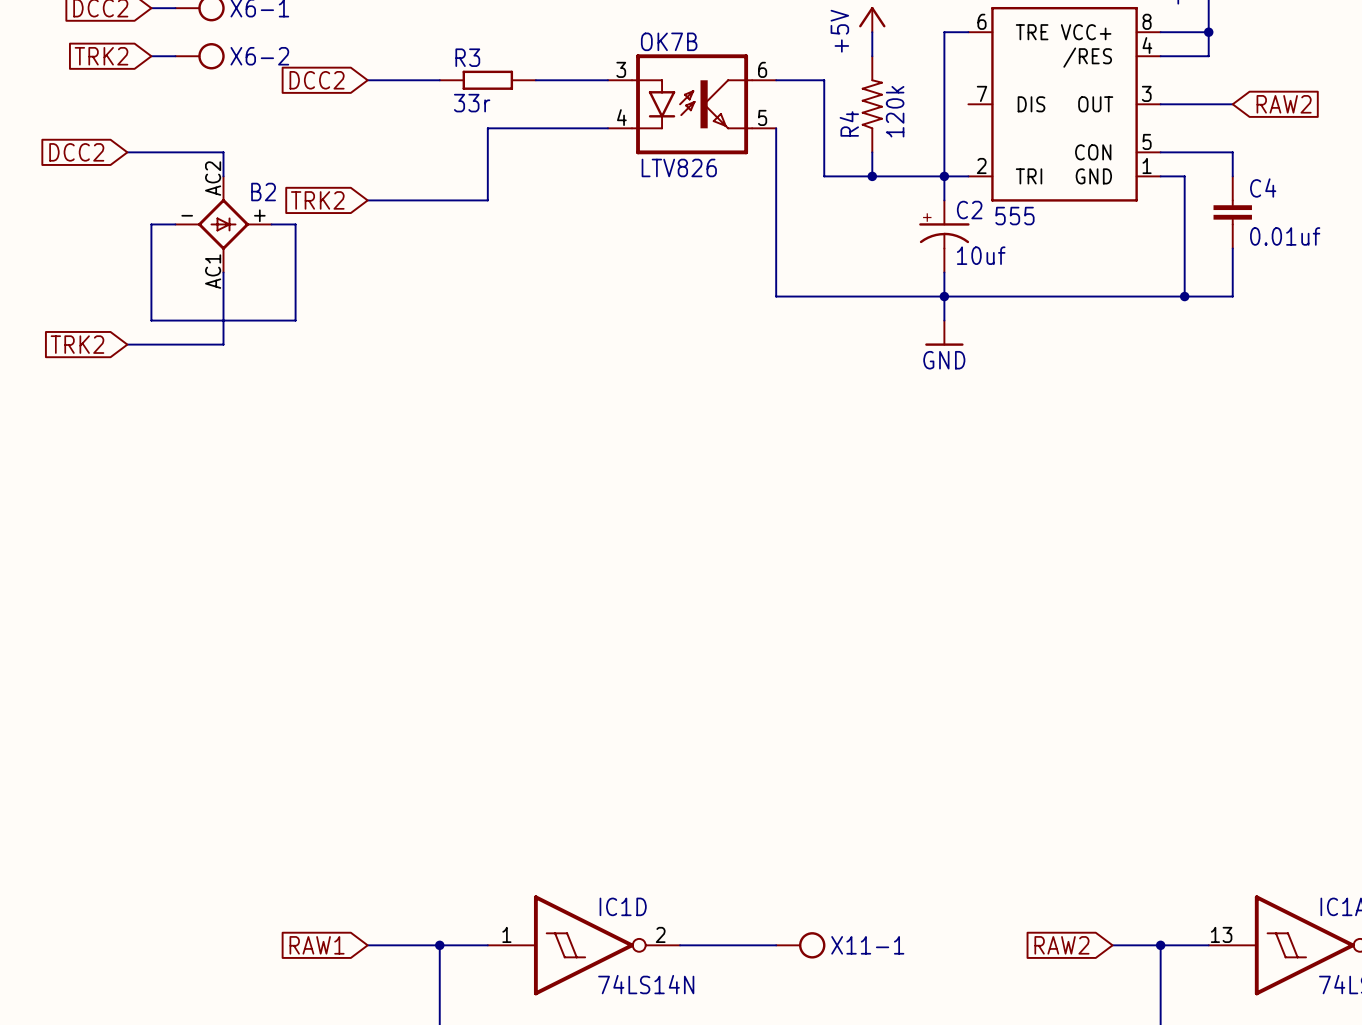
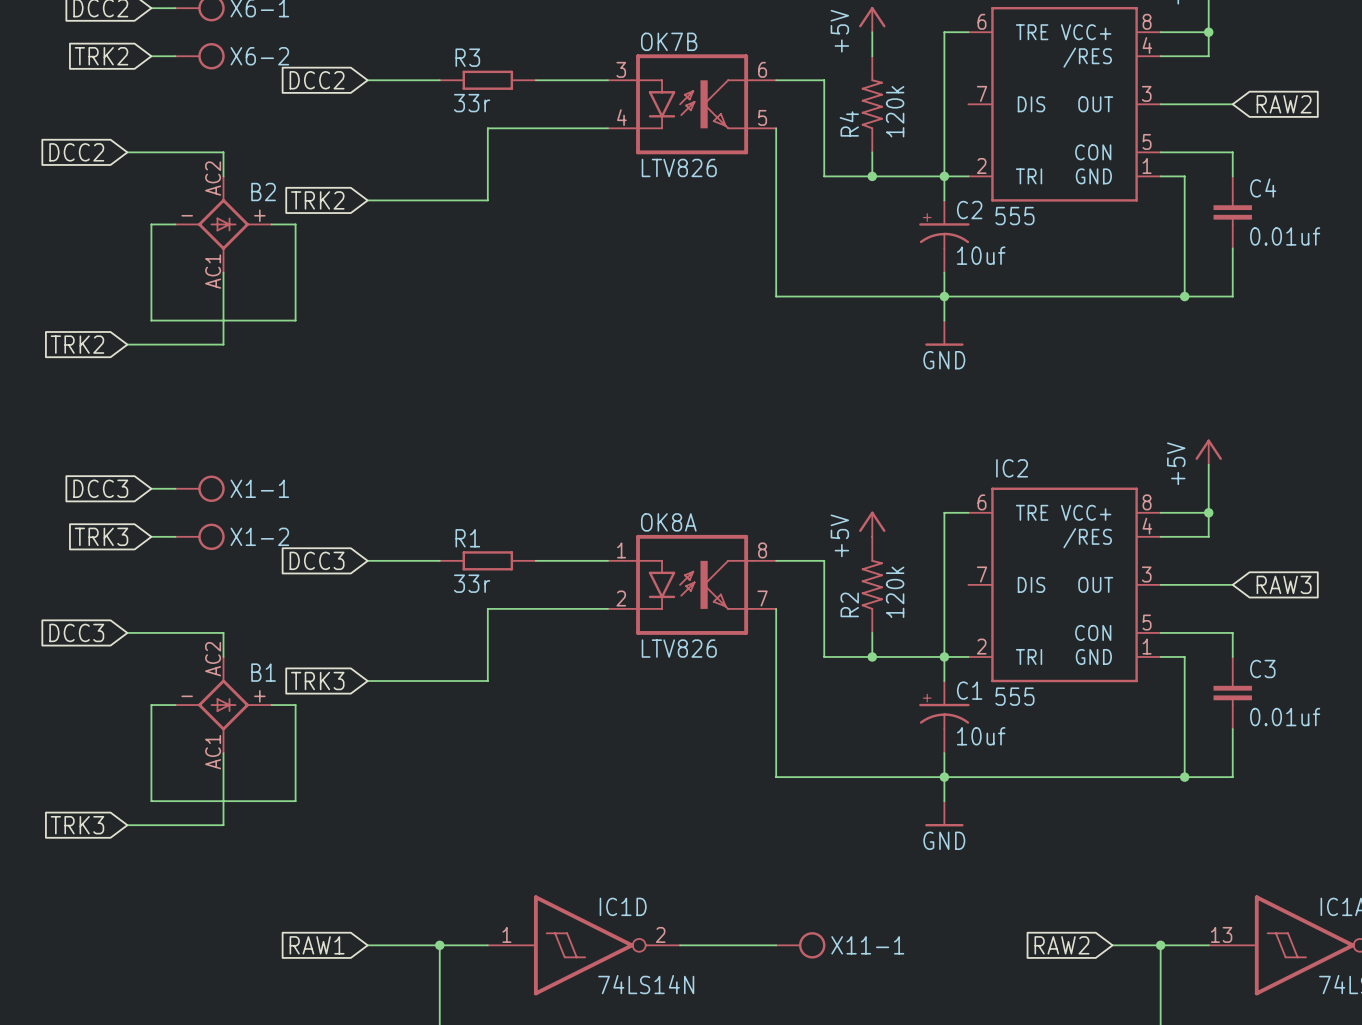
power symbol: none -> +5V (1208, 452)
wire: none -> (1208, 464) (1208, 536) (1160, 536)
global label: none -> DCC3 (100, 488)
wire: none -> (151, 488) (175, 488)
X1-1: none -> (200, 488)
wire: none -> (968, 512) (944, 512) (944, 681)
wire: none -> (1160, 512) (1208, 512)
junction: none -> (1208, 512)
power symbol: none -> +5V (872, 524)
global label: none -> TRK3 (101, 536)
wire: none -> (151, 536) (175, 536)
X1-2: none -> (200, 536)
global label: none -> DCC3 (317, 560)
wire: none -> (367, 560) (439, 560)
R1: none -> 33r (487, 560)
wire: none -> (535, 560) (607, 560)
wire: none -> (776, 560) (824, 560) (824, 656) (968, 656)
OK8A: none -> LTV826 (692, 584)
R2: none -> 120k (872, 584)
IC2: none -> 555 (1064, 584)
wire: none -> (1160, 584) (1232, 584)
global label: none -> RAW3 (1284, 584)
wire: none -> (607, 608) (487, 608) (487, 681) (367, 681)
wire: none -> (776, 608) (776, 777) (1232, 777) (1232, 729)
global label: none -> DCC3 (76, 632)
wire: none -> (127, 632) (223, 632) (223, 656)
wire: none -> (872, 632) (872, 656)
wire: none -> (1160, 632) (1232, 632) (1232, 656)
junction: none -> (872, 656)
junction: none -> (944, 656)
wire: none -> (1160, 656) (1184, 656) (1184, 777)
global label: none -> TRK3 (317, 681)
C3: none -> 0.01uf (1232, 693)
wire: none -> (175, 705) (151, 705) (151, 801) (295, 801) (295, 705) (271, 705)
B1: none -> (223, 705)
C1: none -> 10uf (944, 717)
wire: none -> (223, 753) (223, 825) (127, 825)
wire: none -> (944, 753) (944, 801)
junction: none -> (944, 777)
junction: none -> (1184, 777)
power symbol: none -> GND (944, 813)
global label: none -> TRK3 (77, 825)

